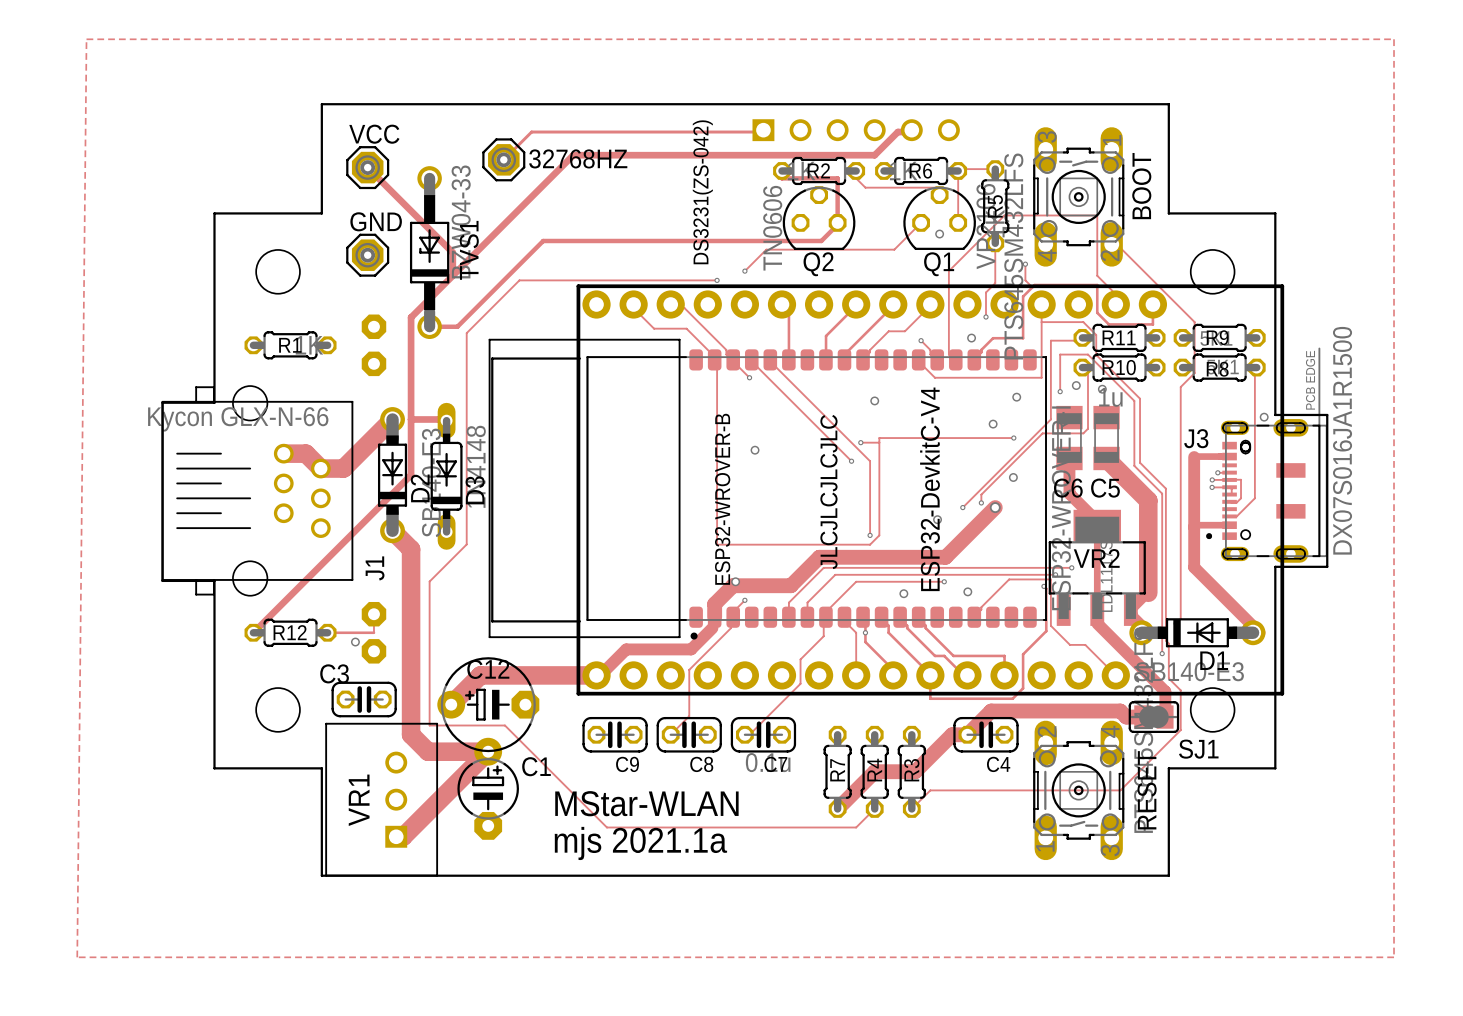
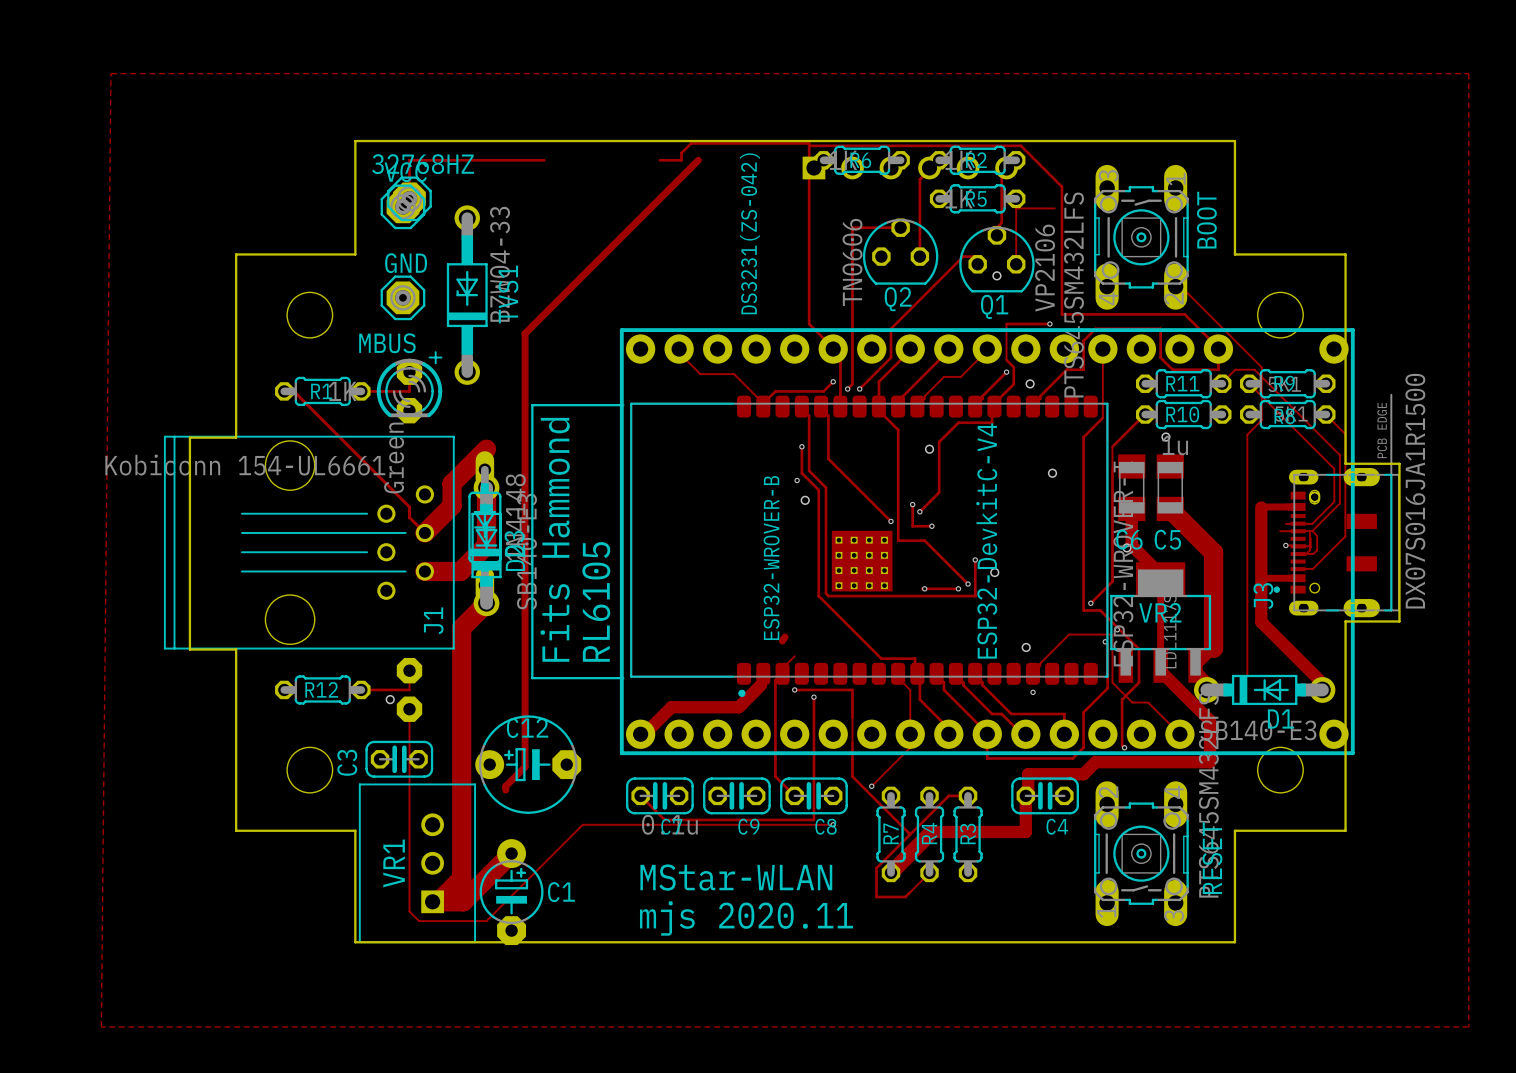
track: none -> (809, 145) (1021, 145) (1061, 186) (1061, 314) (1184, 314) (1218, 349)
track: none -> (544, 160) (409, 160) (409, 198)
track: none -> (659, 160) (681, 160) (681, 153) (691, 143) (809, 143) (809, 324) (833, 349)
track: none -> (698, 160) (525, 333) (525, 767) (505, 786) (505, 790)
track: none -> (939, 160) (919, 179) (919, 256)
track: none -> (1016, 160) (1001, 174) (1001, 222) (996, 227)
track: (763, 130) (763, 132) (531, 132) (503, 159) -> none
track: (911, 130) (911, 132) (897, 132) (874, 155) (573, 155) (411, 317) (411, 475) (253, 632) -> none
32768HZ name position: 32768HZ (578, 158) -> 32768HZ (423, 164)
32768HZ position: (503, 159) -> (409, 198)
track: (367, 167) (452, 252) (452, 275) -> none
track: (781, 170) (781, 178) (837, 178) (837, 224) (821, 240) (543, 240) (457, 326) (429, 326) -> none
R2 position: (819, 170) -> (977, 160)
track: (856, 170) (856, 178) (865, 187) (939, 187) (939, 195) -> none
R6 position: (921, 170) -> (862, 160)
track: none -> (900, 227) (852, 227) (852, 384) (847, 389)
R5 rotation: 0° (995, 206) -> 90° clockwise (977, 198)
R5 position: (995, 206) -> (977, 198)
board edge: (214, 213) (214, 402) (162, 402) -> (243, 254) (236, 254) (236, 437) (189, 437) (189, 451)
track: none -> (977, 256) (963, 256) (891, 328) (891, 357) (859, 389)
Q2 position: (819, 218) -> (900, 251)
track: (921, 222) (894, 249) (766, 249) (744, 271) -> none
track: (995, 243) (995, 283) (986, 292) (986, 317) -> none
track: (1025, 264) (1025, 280) (1032, 287) -> none
via: (1025, 264) -> none
via: (744, 271) -> none
track: (717, 280) (519, 280) (466, 333) (466, 544) (429, 581) (429, 725) (504, 725) (606, 827) (856, 827) -> (968, 795) (948, 795) (876, 868) (876, 897) (905, 897) (910, 892)
via: (717, 280) -> none
track: (948, 280) (948, 271) (1004, 215) (1097, 215) (1097, 275) (1115, 294) (1115, 304) -> (1006, 324) (1049, 324)
via: none -> (1049, 324)
part footprint: [491, 284, 1285, 696] -> [531, 328, 1355, 756]
track: (670, 304) (670, 308) (684, 308) (726, 349) (726, 354) (749, 377) -> none
track: (948, 315) (948, 354) (955, 359) -> (1006, 360) (1013, 367) (1013, 384) (994, 403) (992, 408) (992, 422) (958, 422) (939, 441) (939, 492) (919, 511)
via: (986, 317) -> none
track: (1041, 322) (1083, 322) (1096, 334) (1096, 355) (1140, 398) (1140, 462) (1165, 488) (1165, 640) (1169, 643) (1168, 678) (1180, 690) (1180, 730) (1120, 790) (930, 790) (911, 808) -> none
track: (1023, 324) (1023, 338) (993, 338) -> (1083, 369) (1066, 369) (1052, 384)
track: none -> (409, 372) (409, 391) (361, 391)
via: none -> (1006, 372)
via: none -> (833, 381)
track: (1082, 337) (1078, 340) (1050, 340) (1050, 398) -> (1145, 414) (1112, 446)
track: none -> (1222, 383) (1235, 369) (1254, 369) (1339, 455) (1339, 503) (1312, 531) (1317, 535) (1317, 550) (1313, 553) (1305, 553)
track: none -> (1249, 383) (1334, 468) (1334, 501) (1312, 523) (1305, 523)
board edge: (489, 339) (489, 637) (679, 637) (679, 339) (489, 339) -> none
track: (921, 340) (930, 349) (930, 354) (937, 359) -> none
via: (921, 340) -> none
via: none -> (847, 389)
via: none -> (859, 389)
track: none -> (284, 391) (293, 391) (409, 506) (409, 517) (424, 532) (452, 505) (452, 483) (486, 449)
MBUS side: bottom (373, 345) -> top (409, 387)
part footprint: [586, 349, 1047, 640] -> [630, 395, 1109, 698]
track: (714, 356) (717, 359) (714, 359) (717, 363) (717, 544) (870, 544) (879, 535) (879, 438) (1013, 438) -> (763, 403) (763, 406) (760, 405) (775, 391) (823, 391) (833, 381)
track: none -> (878, 406) (878, 410) (898, 429) (898, 540) (924, 540) (968, 584)
track: (918, 359) (935, 377) (1041, 377) (1041, 370) -> (975, 406) (982, 396) (1006, 372)
track: (1082, 367) (1088, 368) (1088, 428) (1083, 433) (1042, 433) (981, 494) (981, 502) -> none
track: (1256, 367) (1254, 368) (1254, 498) (1236, 516) (1229, 516) -> (1326, 414) (1345, 434) (1345, 536) (1312, 568) (1305, 569)
track: (758, 368) (851, 461) -> (809, 415) (809, 470) (826, 487) (826, 593) (828, 596) (975, 596) (975, 559)
track: (777, 368) (870, 461) (870, 535) -> (828, 415) (828, 458) (891, 521)
track: none -> (1102, 417) (1083, 437) (1083, 610) (1100, 610) (1138, 649) (1138, 682) (1122, 699) (1122, 745) (1124, 747)
via position: (749, 377) -> (801, 446)
via: (1076, 385) -> none
J1 footprint: [161, 386, 354, 596] -> [163, 435, 455, 650]
track: (1060, 391) (1060, 354) (1088, 354) (1134, 400) (1134, 465) (1162, 493) (1162, 653) -> none
via: (1060, 391) -> none
via: (1016, 397) -> none
track: none -> (801, 446) (801, 473) (818, 490) (818, 596) (881, 658) (915, 658) (915, 670) (917, 673)
via: (1264, 417) -> none
J1 value: Kycon GLX-N-66 (238, 419) -> Kobiconn 154-UL6661 (245, 465)
track: (392, 419) (343, 468) (320, 468) (305, 453) (283, 453) -> none
track: (411, 419) (446, 420) -> none
track: (1050, 419) (962, 507) -> (1112, 468) (1112, 581) (1090, 603)
via: none -> (797, 480)
track: none -> (486, 487) (486, 545) (460, 571) (424, 571)
via: (1013, 438) -> none
J3 name rotation: 0° (1196, 438) -> 90° counterclockwise (1263, 596)
J3 name position: J3 (1196, 438) -> J3 (1263, 596)
track: (860, 442) (879, 442) -> none
via: (860, 442) -> none
track: none -> (912, 504) (912, 526) (931, 526)
via: none -> (912, 504)
via: (851, 461) -> none
via: none -> (919, 511)
via: none -> (891, 521)
via: (1217, 472) -> none
D2 position: (392, 475) -> (486, 545)
via: none -> (931, 526)
via position: (1013, 477) -> (1126, 547)
via: (1212, 479) -> none
track: none -> (1310, 537) (1310, 547) (1305, 545) (1285, 545)
track: (1212, 487) (1229, 487) (1231, 489) (1231, 493) (1229, 494) -> none
via: (1212, 487) -> none
text: JLCJLCJLCJLC (828, 492) -> none
via: none -> (1285, 545)
text: none -> Fits Hammond (555, 539)
via: (981, 502) -> none
via: none -> (975, 559)
via: (962, 507) -> none
track: (995, 507) (945, 557) (819, 557) (790, 585) (733, 585) (714, 604) (714, 617) -> none
via: (995, 507) -> none
track: (392, 530) (411, 549) (411, 734) (428, 751) (488, 751) (403, 836) -> (511, 853) (463, 901) (439, 901)
via: none -> (968, 584)
track: none -> (922, 588) (958, 588)
via: none -> (958, 588)
text: none -> RL6105 (596, 601)
track: none -> (486, 603) (461, 628) (461, 878) (438, 901) (432, 901)
via: none -> (1090, 603)
track: (1071, 567) (823, 567) (788, 602) (788, 617) -> none
via: (1071, 567) -> none
track: (1055, 574) (835, 574) (807, 602) (807, 617) -> none
board edge: (162, 580) (214, 580) (214, 768) -> (189, 636) (189, 649) (236, 649) (236, 830) (243, 830)
via: (735, 581) -> none
track: (944, 581) (856, 581) (823, 614) (825, 617) (823, 618) (823, 636) (800, 659) -> (794, 689) (852, 689) (852, 717)
via: (944, 581) -> none
via: (903, 593) -> none
via: (744, 600) -> none
track: (1097, 614) (1097, 623) (1165, 691) (1165, 717) (1126, 717) (1120, 711) (991, 711) (969, 732) -> (1160, 671) (1210, 720) (1210, 762) (1095, 762) (1083, 774) (1028, 774) (1028, 793)
track: (730, 618) (730, 628) (689, 669) (689, 716) (670, 734) -> (780, 675) (775, 680) (775, 776) (794, 795)
via: none -> (794, 689)
via: (865, 632) -> none
via: none -> (1033, 692)
track: none -> (813, 697) (813, 819) (664, 819) (640, 795)
via: none -> (813, 697)
track: none -> (409, 709) (409, 911) (419, 921) (486, 921) (582, 824) (833, 824)
via: (1162, 653) -> none
C3 name rotation: 0° (334, 673) -> 90° counterclockwise (347, 762)
C3 name position: C3 (334, 673) -> C3 (347, 762)
track: (596, 675) (480, 675) (451, 704) -> none
track: none -> (910, 734) (910, 747) (871, 786)
track: (800, 683) (749, 734) (744, 734) -> (852, 742) (852, 776) (910, 834)
via: none -> (1124, 747)
SJ1: (1153, 717) -> none
via: none -> (871, 786)
C9: (615, 734) -> none
C7 position: (763, 734) -> (659, 795)
C8: none -> (813, 795)
track: (967, 734) (952, 734) (915, 771) (874, 771) -> (1025, 795) (1025, 832) (931, 832) (929, 834)
via: none -> (833, 824)
C8 name: C8 (701, 764) -> C9 (748, 826)
C1 name position: C1 (536, 766) -> C1 (561, 892)
C1 position: (488, 788) -> (511, 892)
text position: MStar-WLAN (646, 803) -> MStar-WLAN (736, 877)
text: mjs 2021.1a (640, 843) -> mjs 2020.11 (746, 918)

